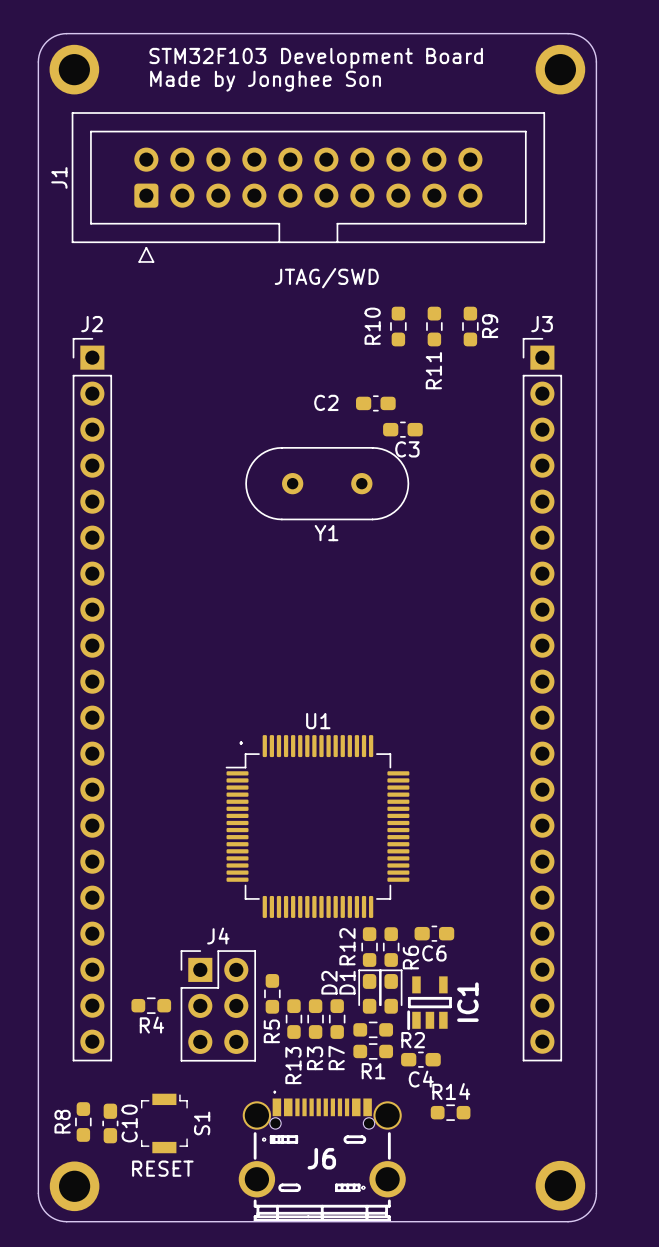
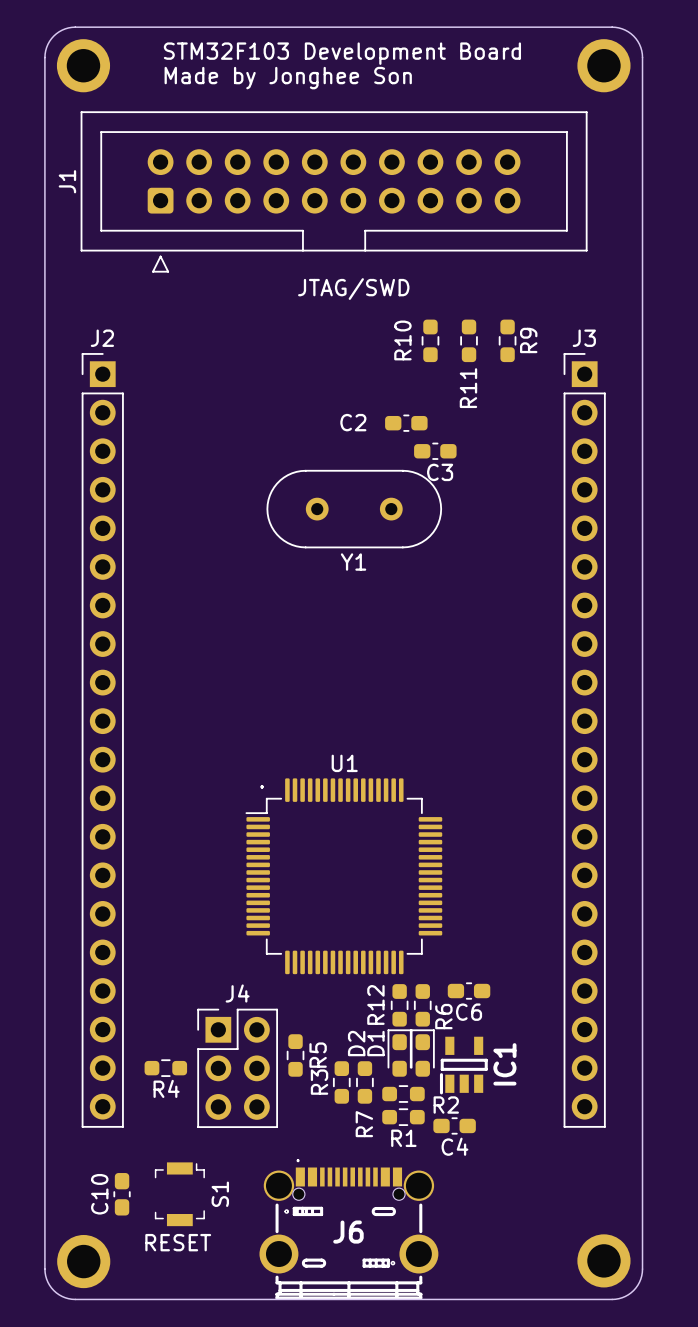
R13: (293, 1019) -> none
R5 name position: R5 (271, 1031) -> R5 (318, 1055)
R3 name position: R3 (315, 1058) -> R3 (319, 1082)
R14: (450, 1112) -> none
R8: (83, 1122) -> none
C10 name position: C10 (129, 1123) -> C10 (99, 1194)

